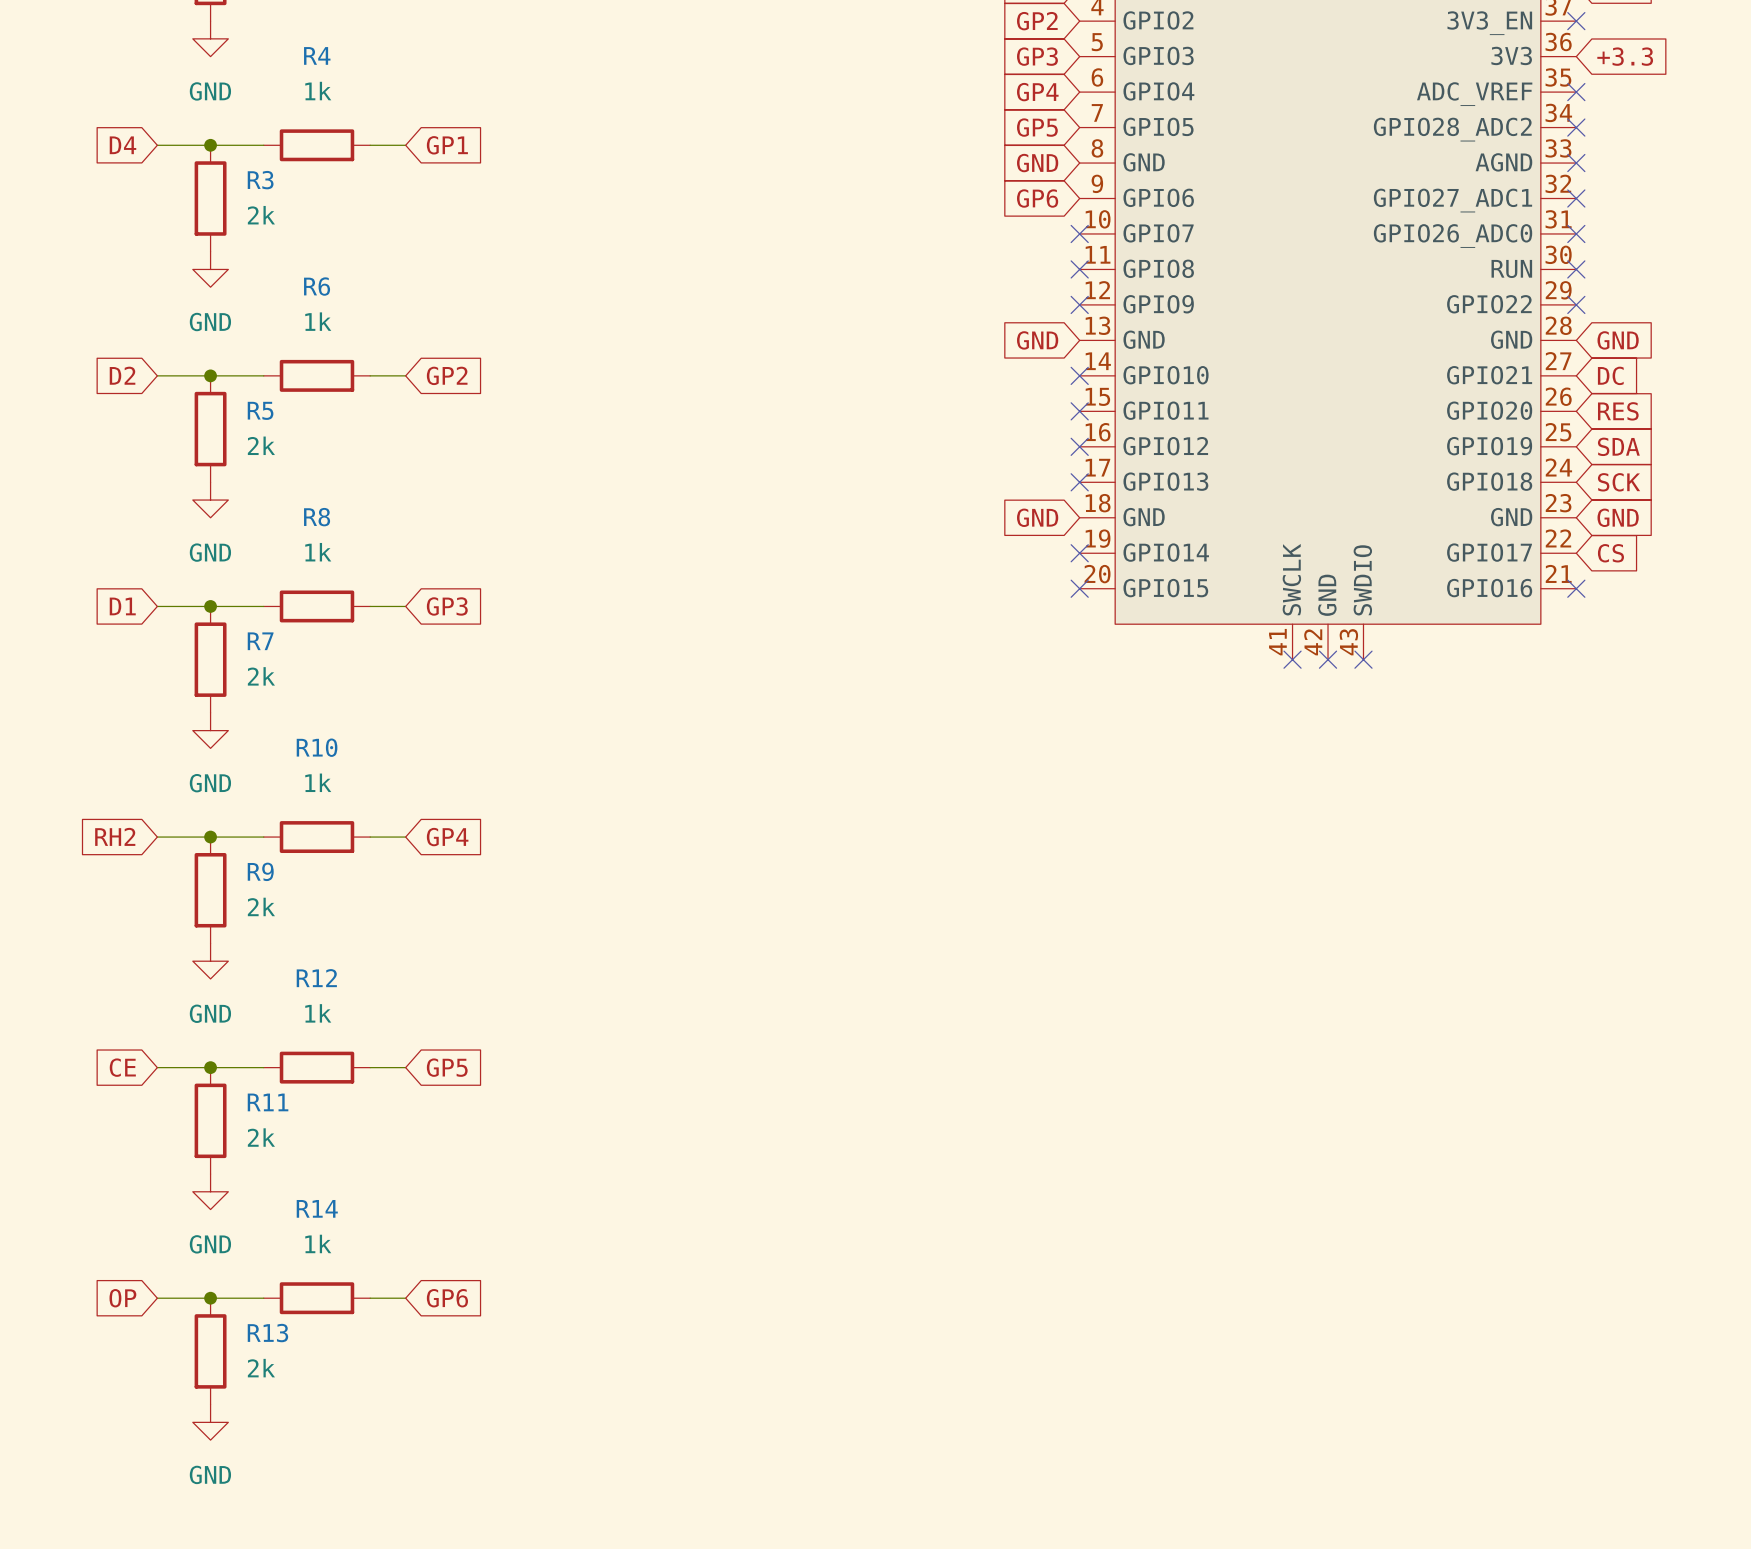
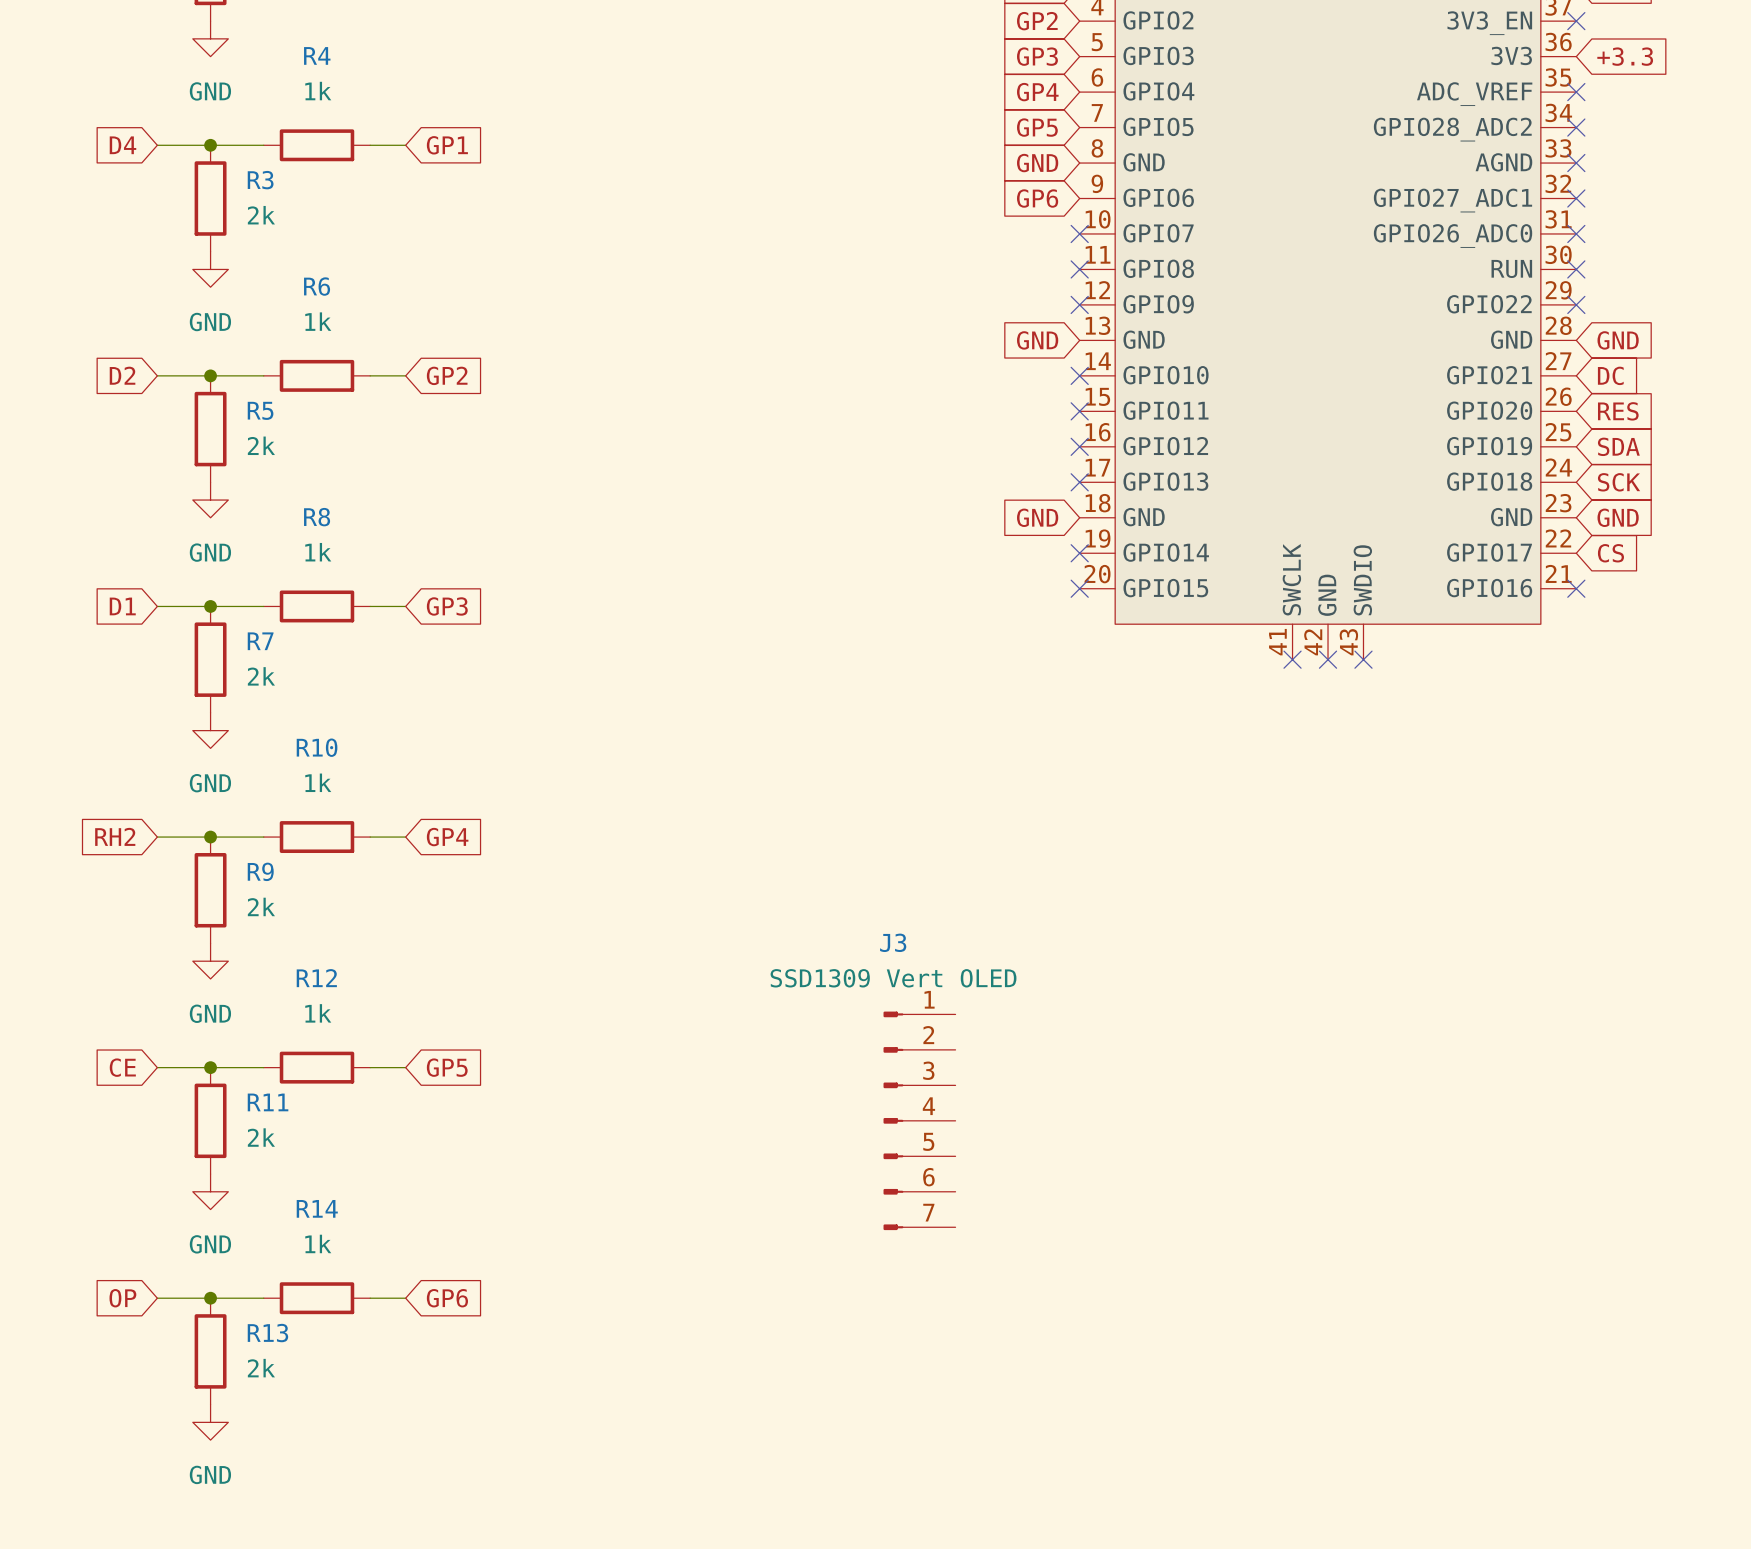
J3: none -> SSD1309 Vert OLED (919, 1120)

